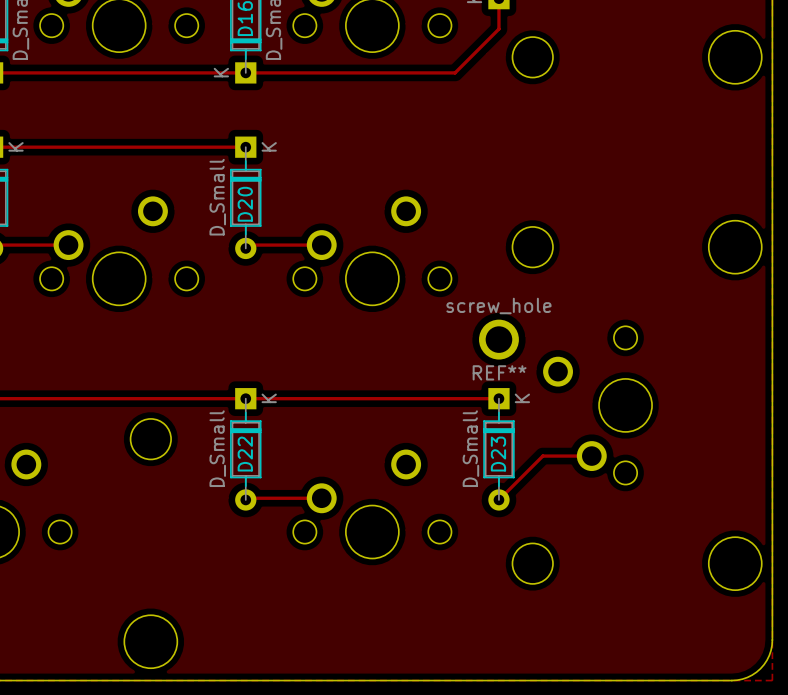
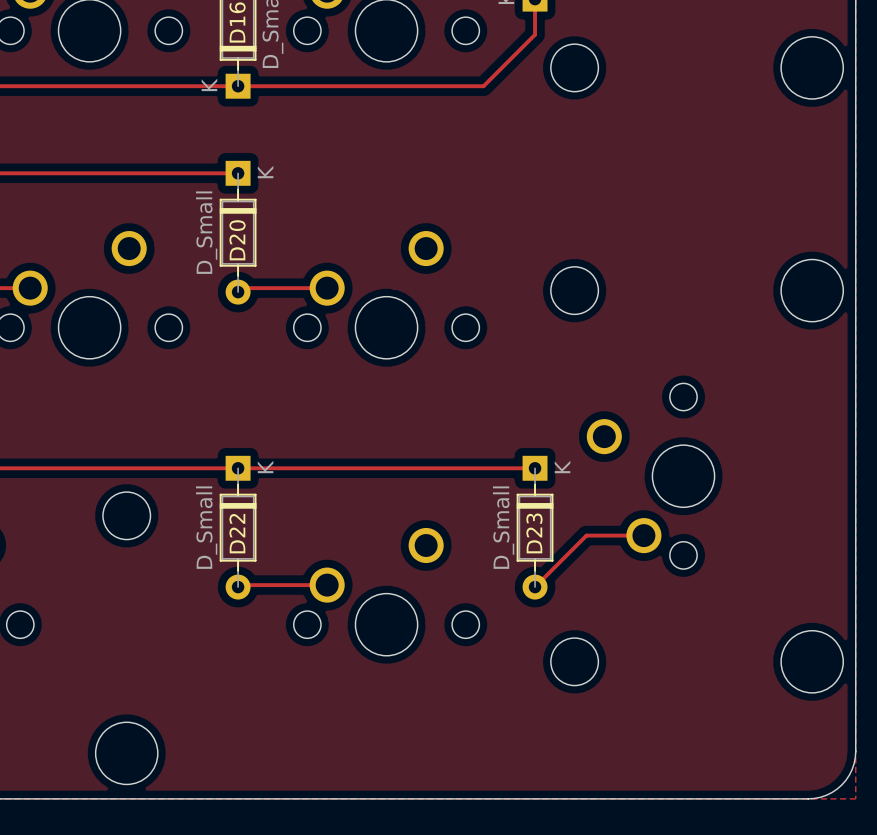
REF**: screw_hole (498, 339) -> none

